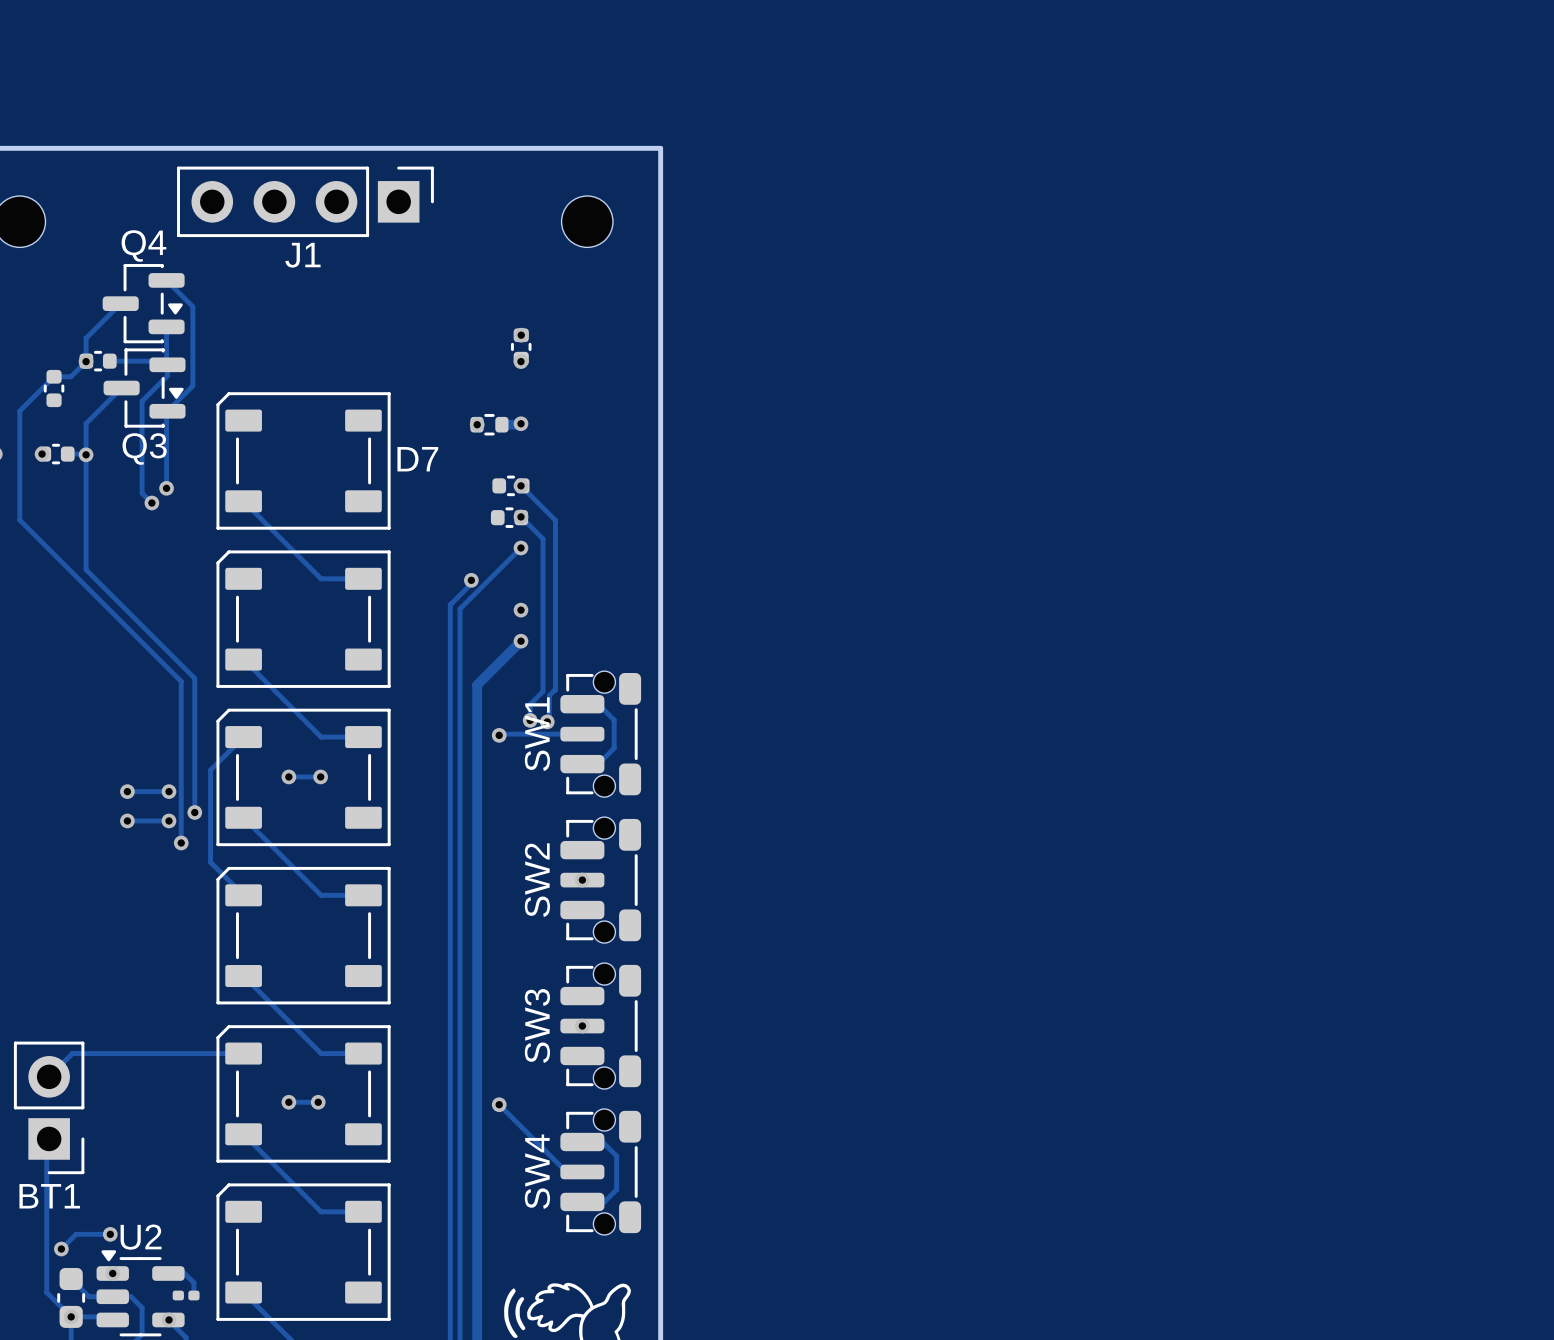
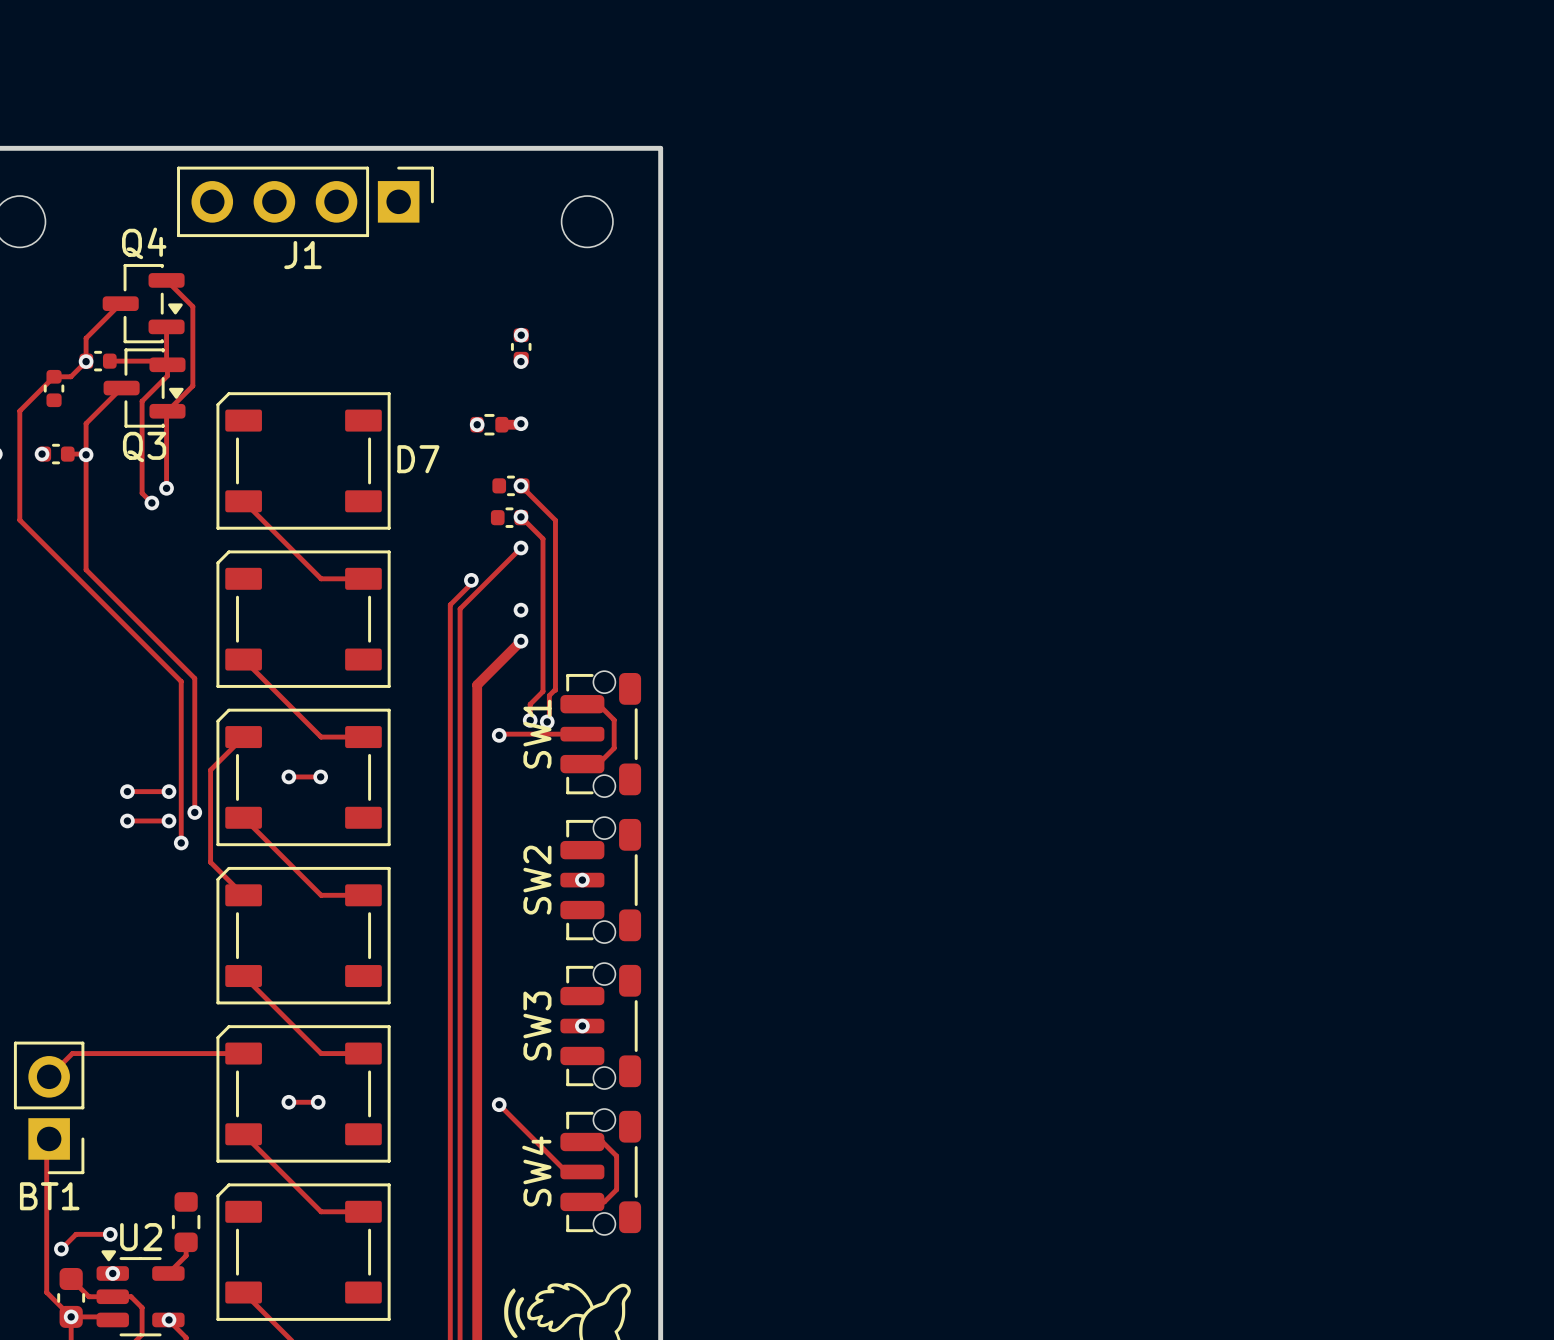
part: none -> (186, 1222)
track: (168, 1273) (184, 1273) (193, 1282) (193, 1295) -> (168, 1273) (186, 1255) (186, 1242)
part: (186, 1295) -> none

